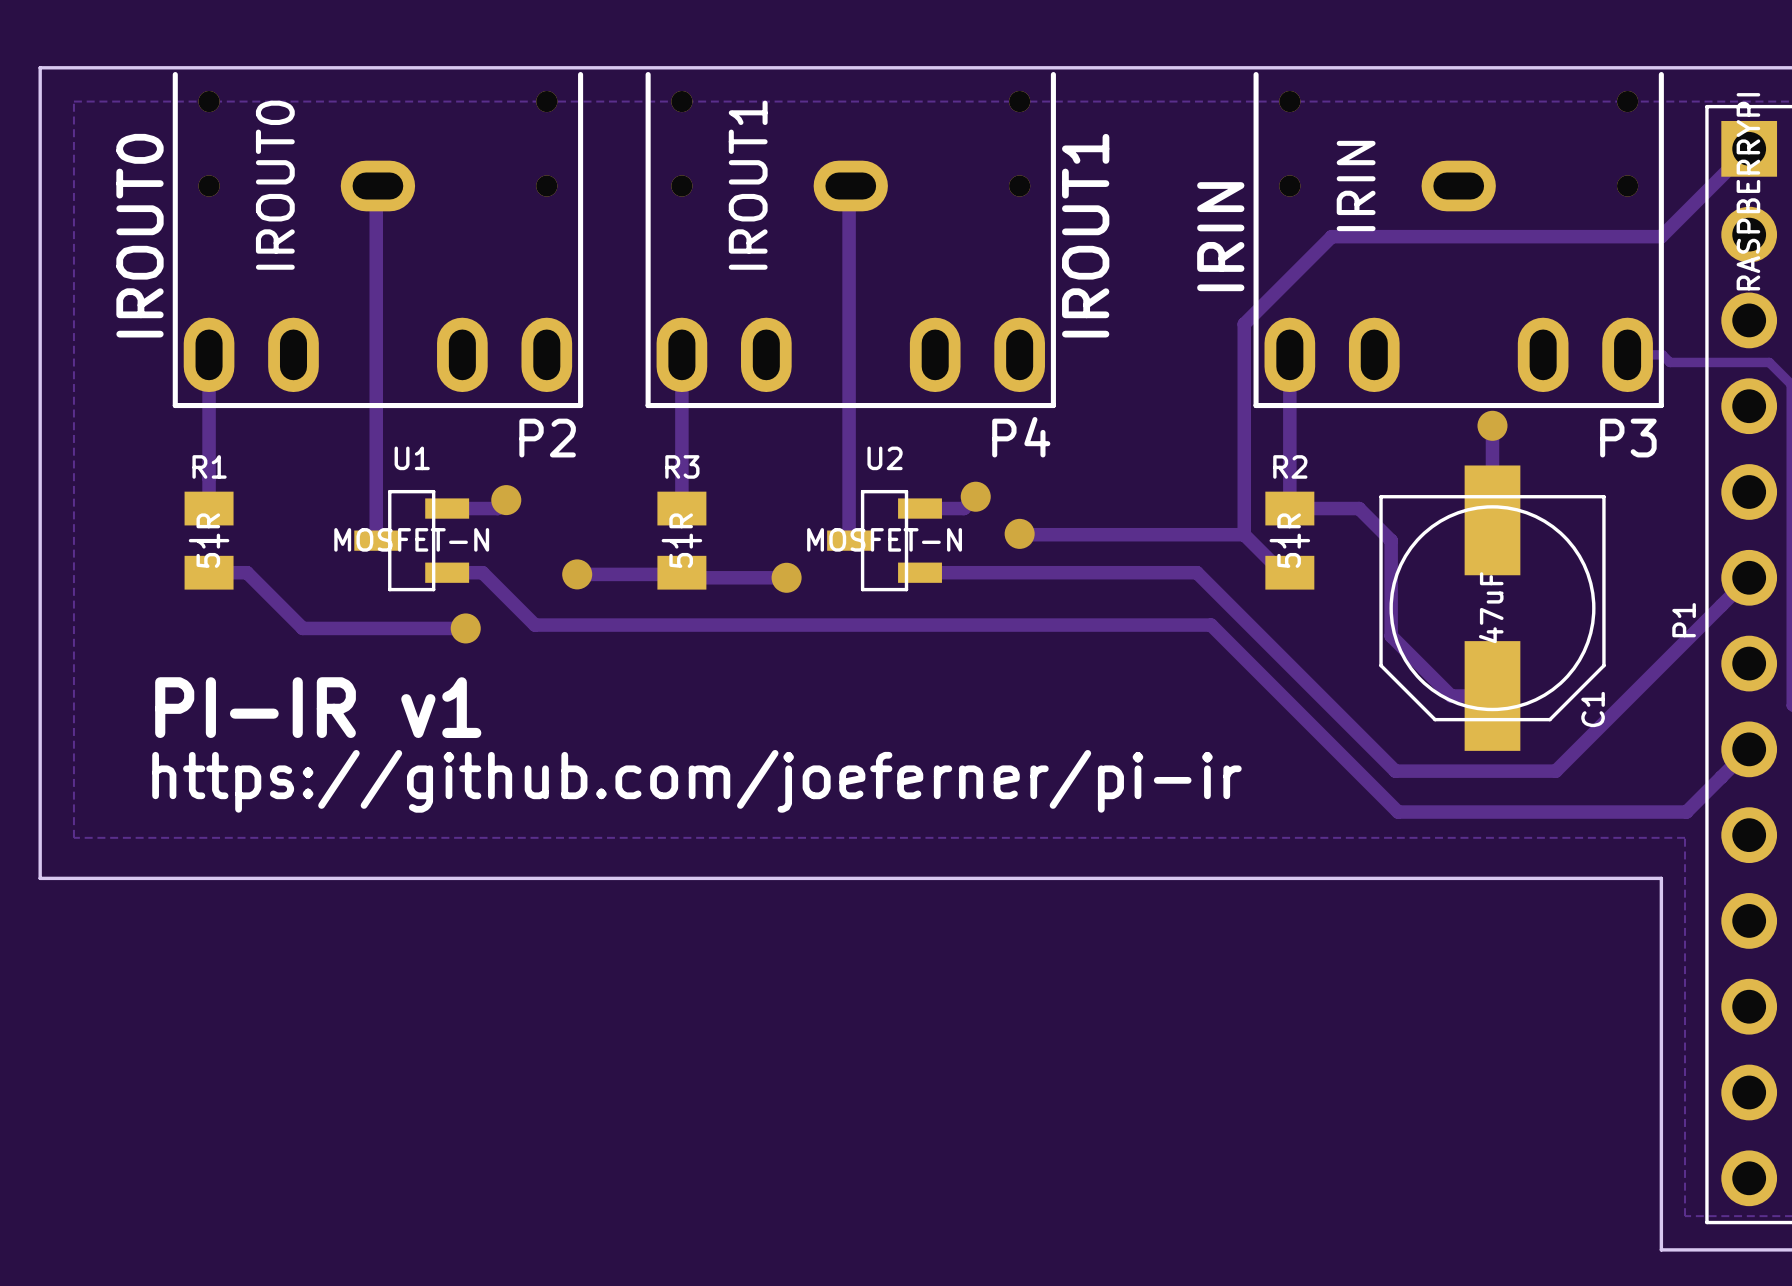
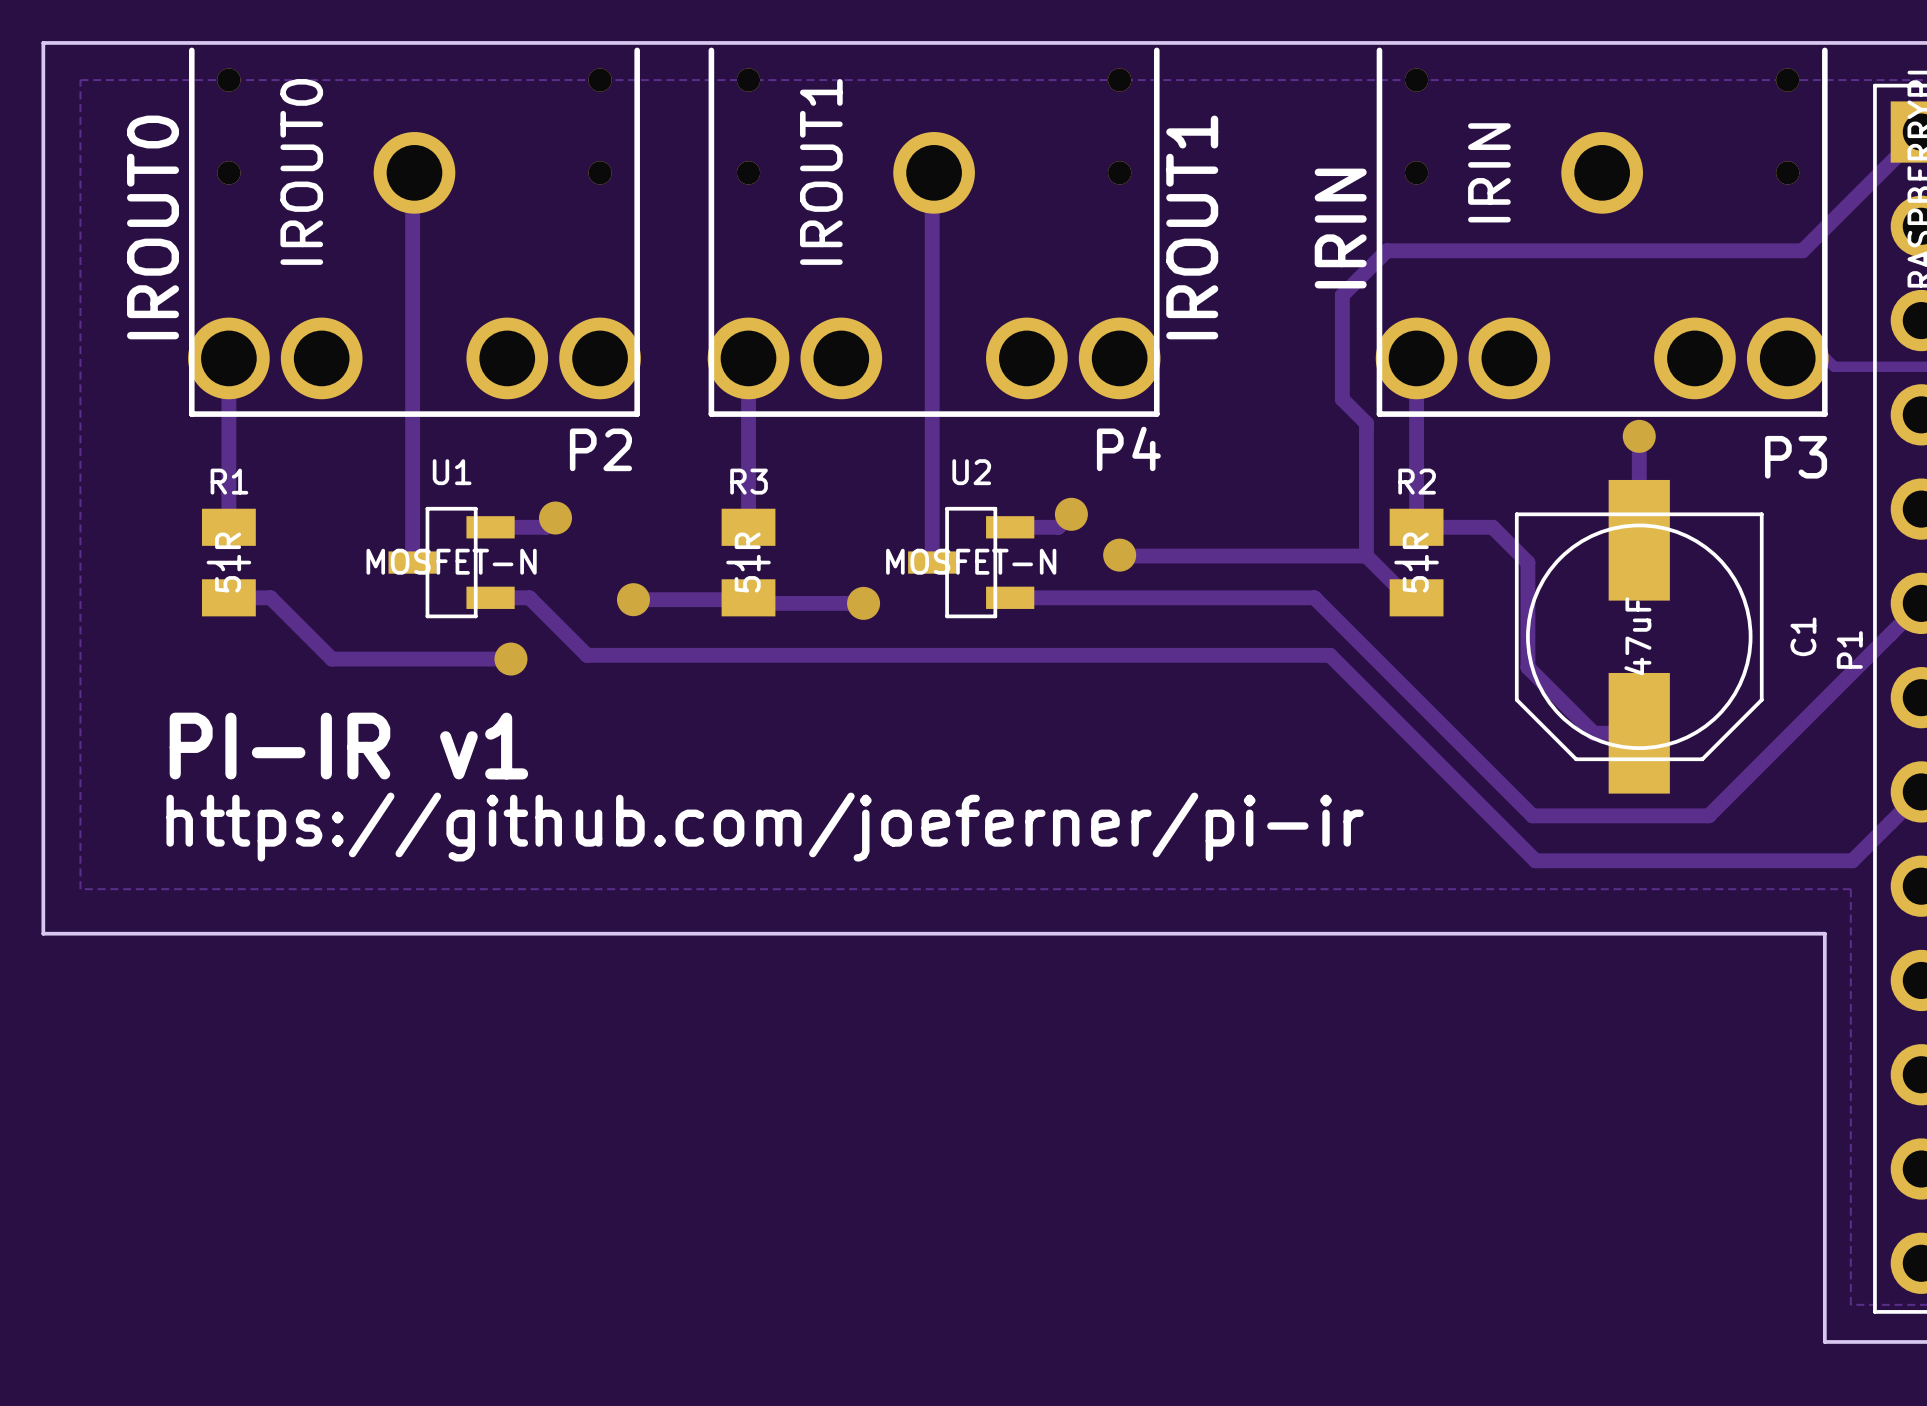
P2 footprint: [172, 72, 584, 409] -> [188, 47, 641, 417]
P4 footprint: [645, 72, 1056, 409] -> [707, 47, 1161, 417]
P3 footprint: [1253, 72, 1664, 409] -> [1375, 47, 1829, 417]
track: (1661, 236) (1331, 236) (1244, 324) (1244, 413) -> (1824, 228) (1802, 250) (1386, 250) (1342, 295) (1342, 399) (1366, 423)
C1 name position: C1 (1593, 709) -> C1 (1803, 636)

